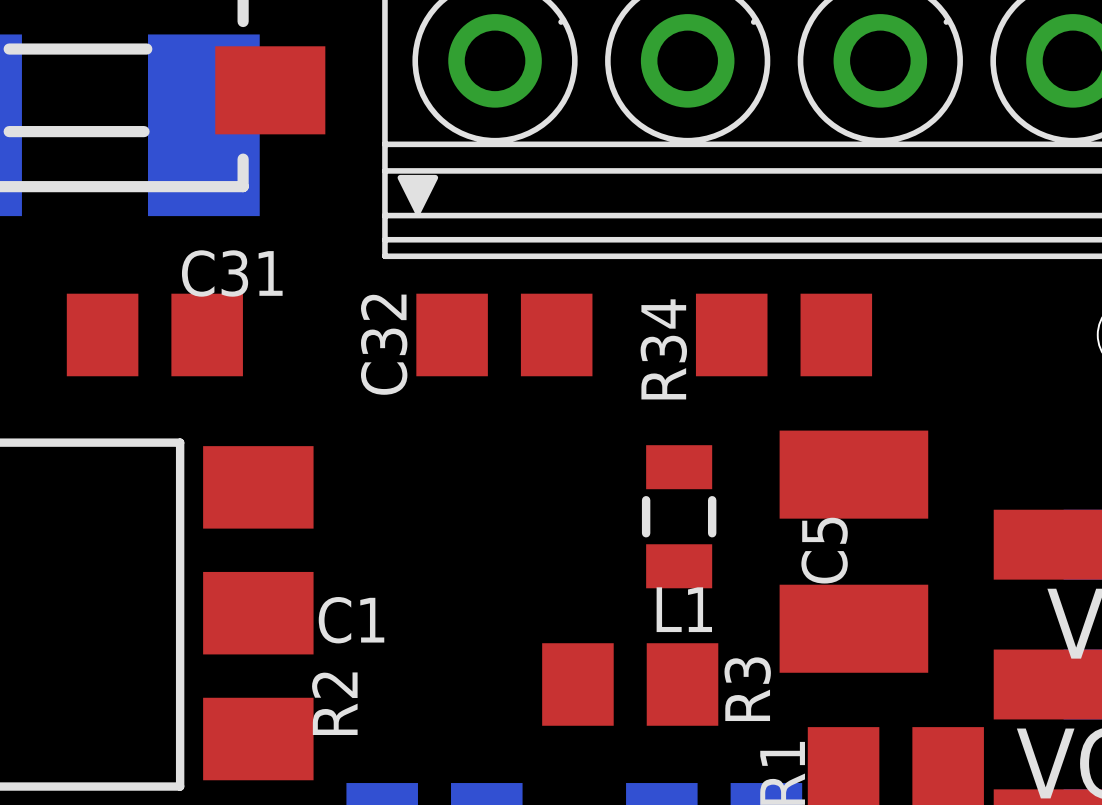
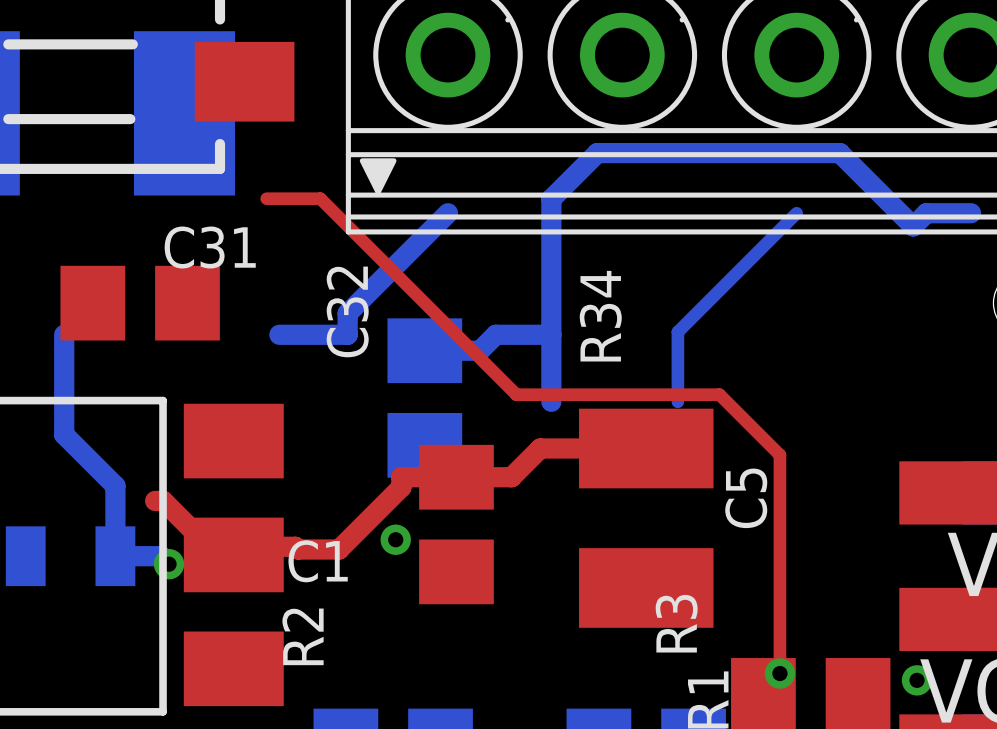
top track: none -> (266, 198) (320, 198) (516, 394) (719, 394) (779, 455) (779, 673)
bottom track: none -> (448, 213) (347, 313) (347, 334) (279, 334)
bottom track: none -> (796, 213) (677, 332) (677, 401)
bottom track: none -> (971, 213) (926, 213) (913, 226) (839, 153) (597, 153) (551, 199) (551, 401)
part: (504, 334) -> none
part: (784, 334) -> none
bottom track: none -> (64, 334) (64, 434) (115, 485) (115, 556) (161, 556) (169, 564)
bottom track: none -> (551, 334) (495, 334) (479, 350) (424, 350)
part: none -> (424, 398)
top track: none -> (646, 448) (540, 448) (511, 477) (401, 477) (401, 487) (339, 549) (298, 549) (295, 546) (209, 546) (163, 500) (155, 500)
L1 side: top (679, 516) -> bottom (70, 556)
part position: (853, 551) -> (646, 518)
part: none -> (456, 524)
via: none -> (395, 539)
via: none -> (169, 564)
part: (630, 684) -> none
via: none -> (779, 673)
via: none -> (917, 680)

